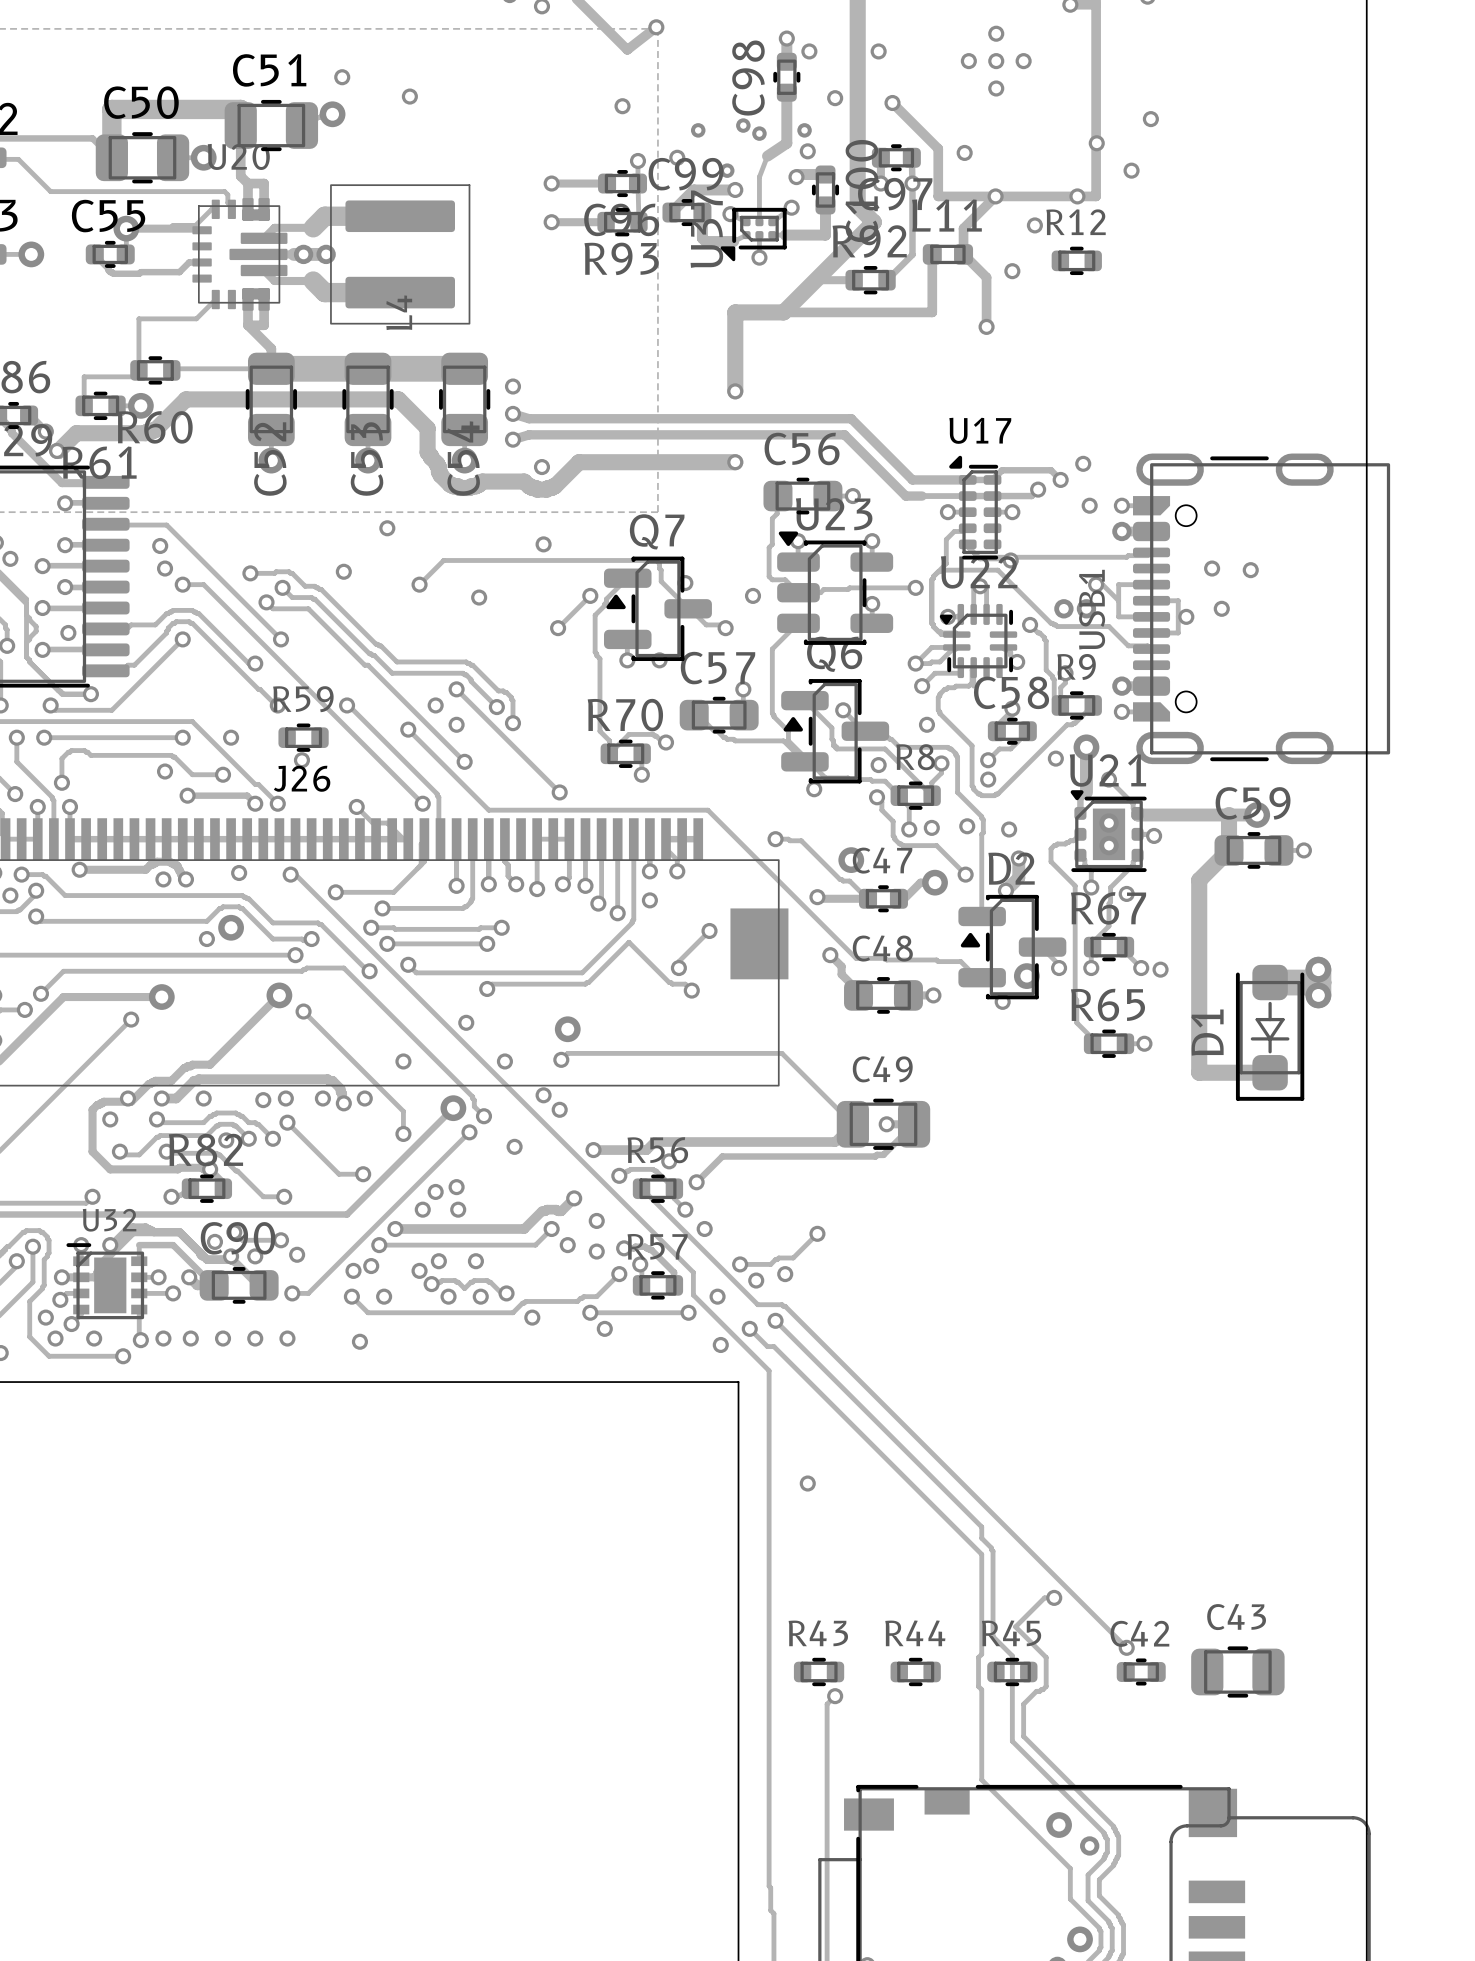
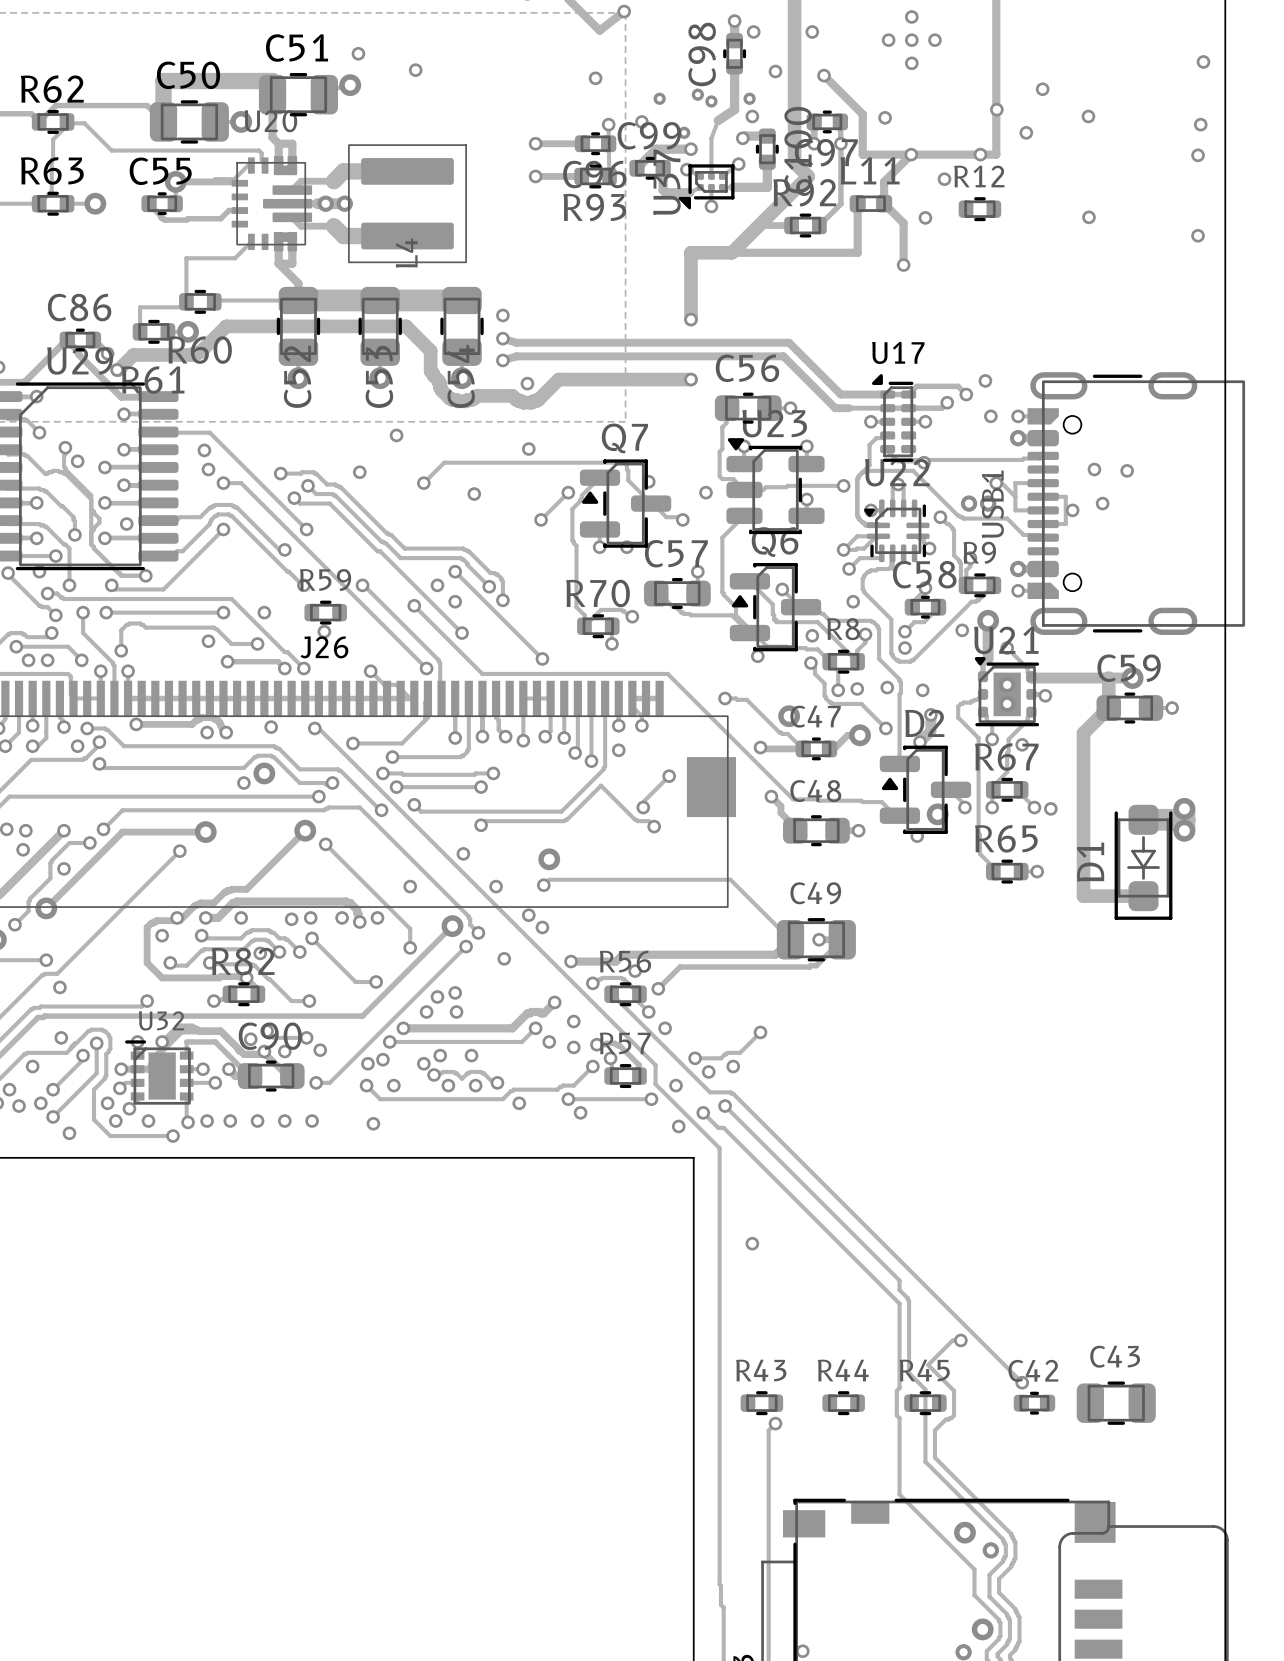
via: none -> (1203, 61)
via: none -> (1088, 116)
via: none -> (1200, 124)
via: none -> (1198, 155)
via: none -> (1088, 217)
via: none -> (1198, 235)

